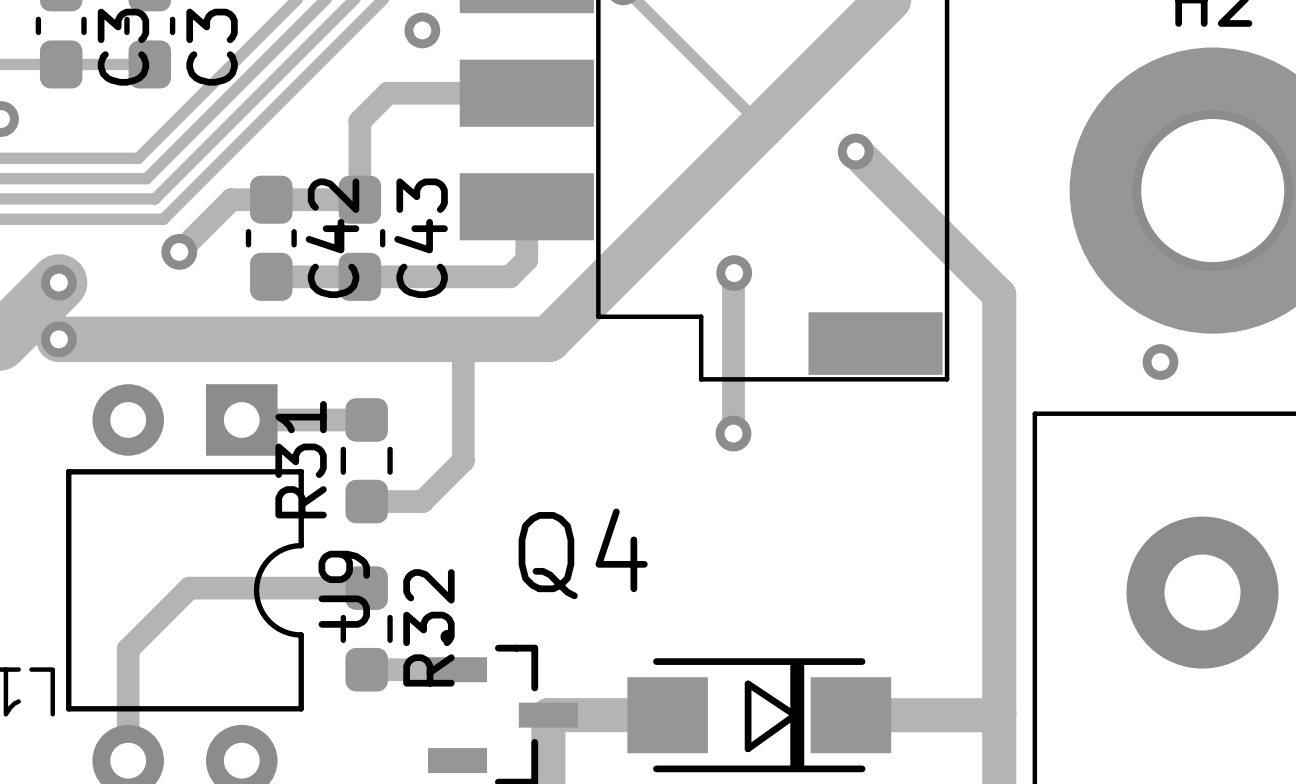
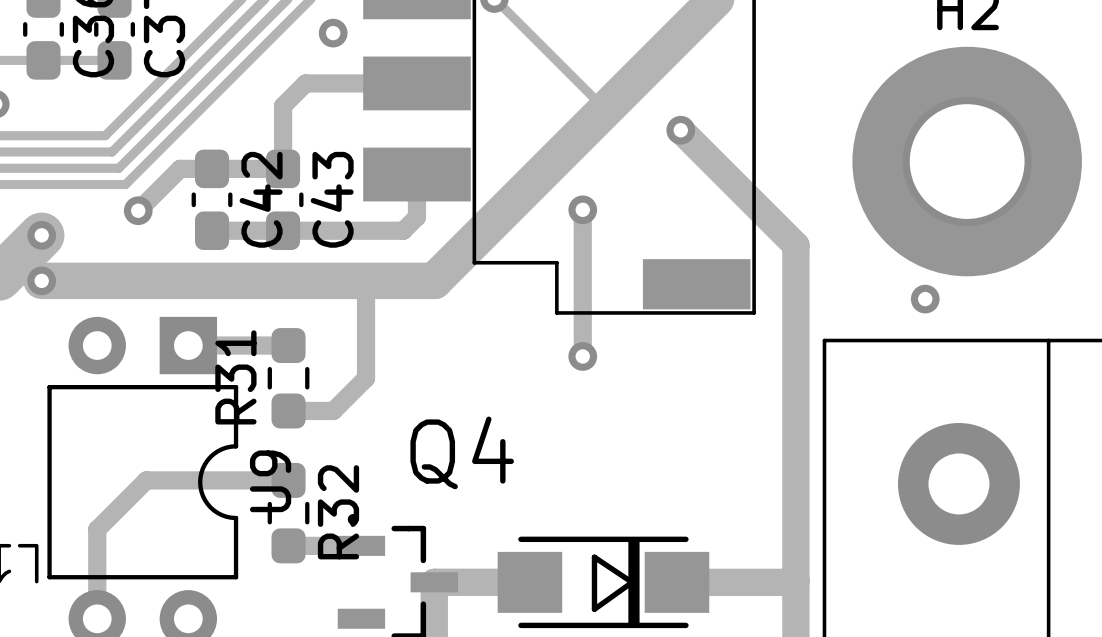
via position: (734, 273) -> (582, 209)

